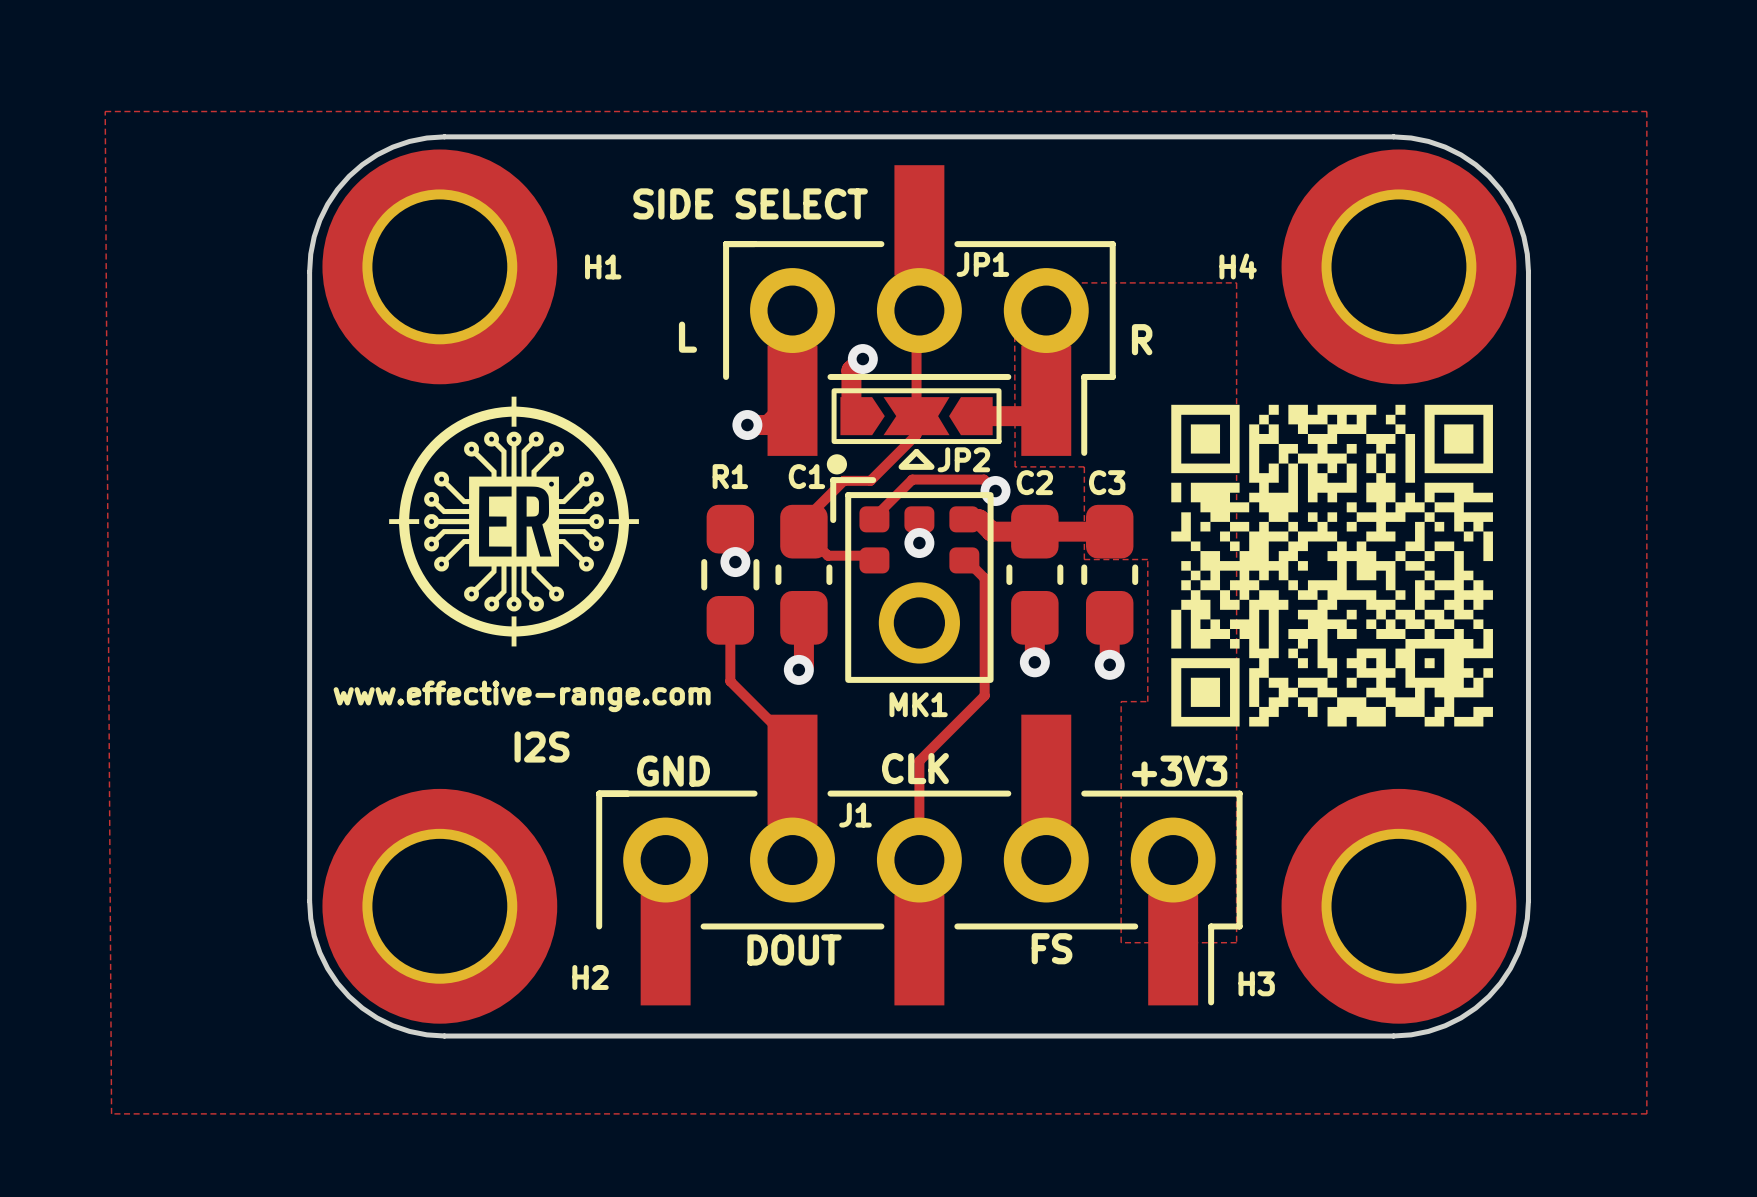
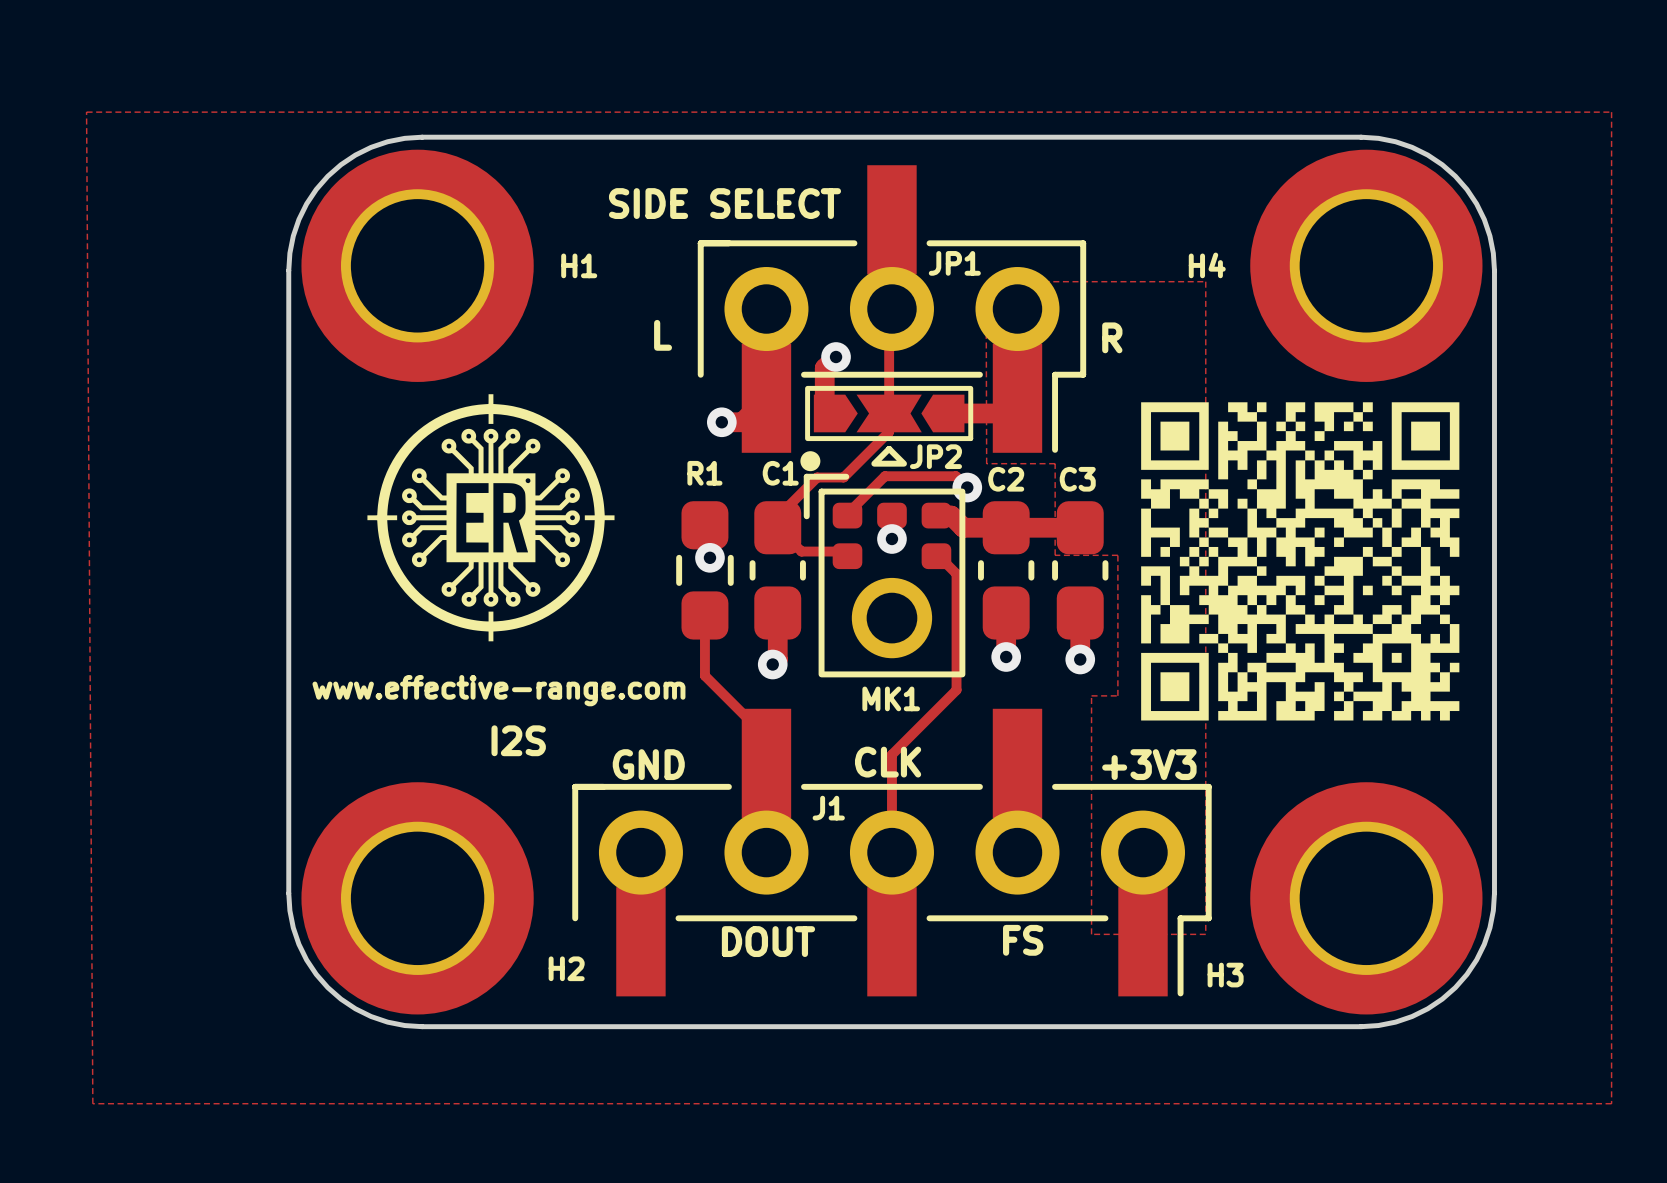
drawing shape: [1171, 404, 1493, 727] -> [1141, 402, 1460, 721]

